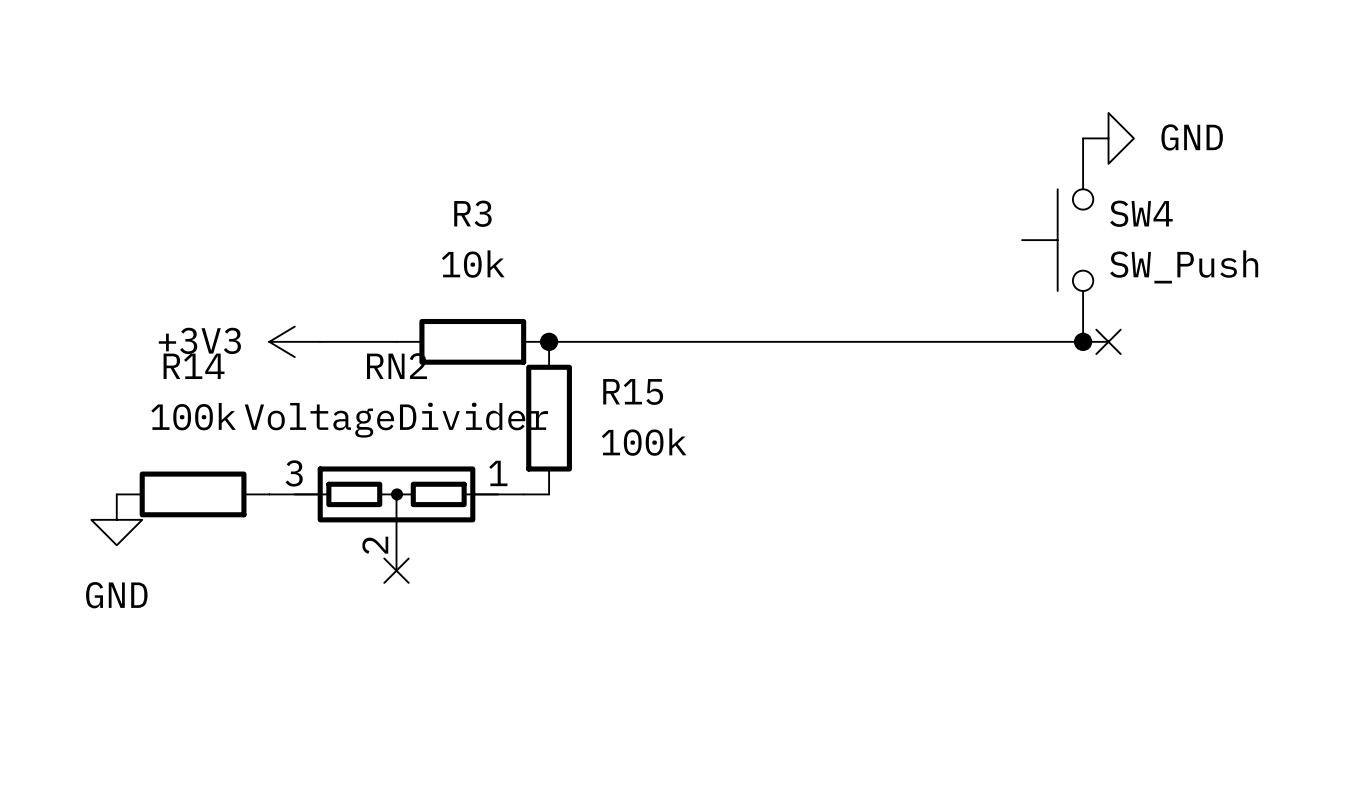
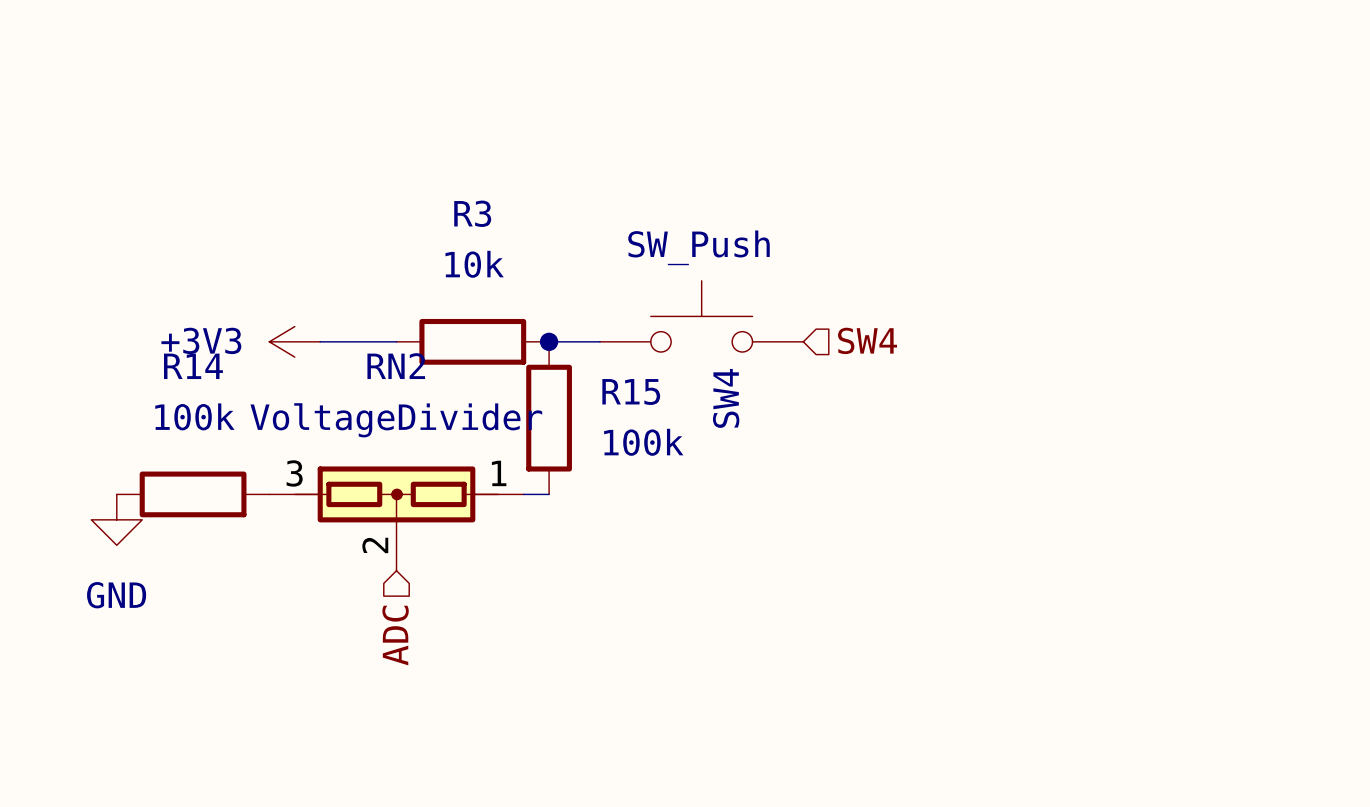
power symbol: GND (1108, 138) -> none
SW4 rotation: 0° (1057, 240) -> 90° clockwise (701, 316)
SW4 position: (1057, 240) -> (701, 316)
SW4 value position: SW_Push (1184, 266) -> SW_Push (698, 247)
hierarchical label: none -> SW4 (867, 340)
wire: (599, 341) (1108, 341) -> none
junction: (1083, 341) -> none
no-connect mark: (1108, 341) -> none
no-connect mark: (396, 570) -> none
hierarchical label: none -> ADC (395, 635)

